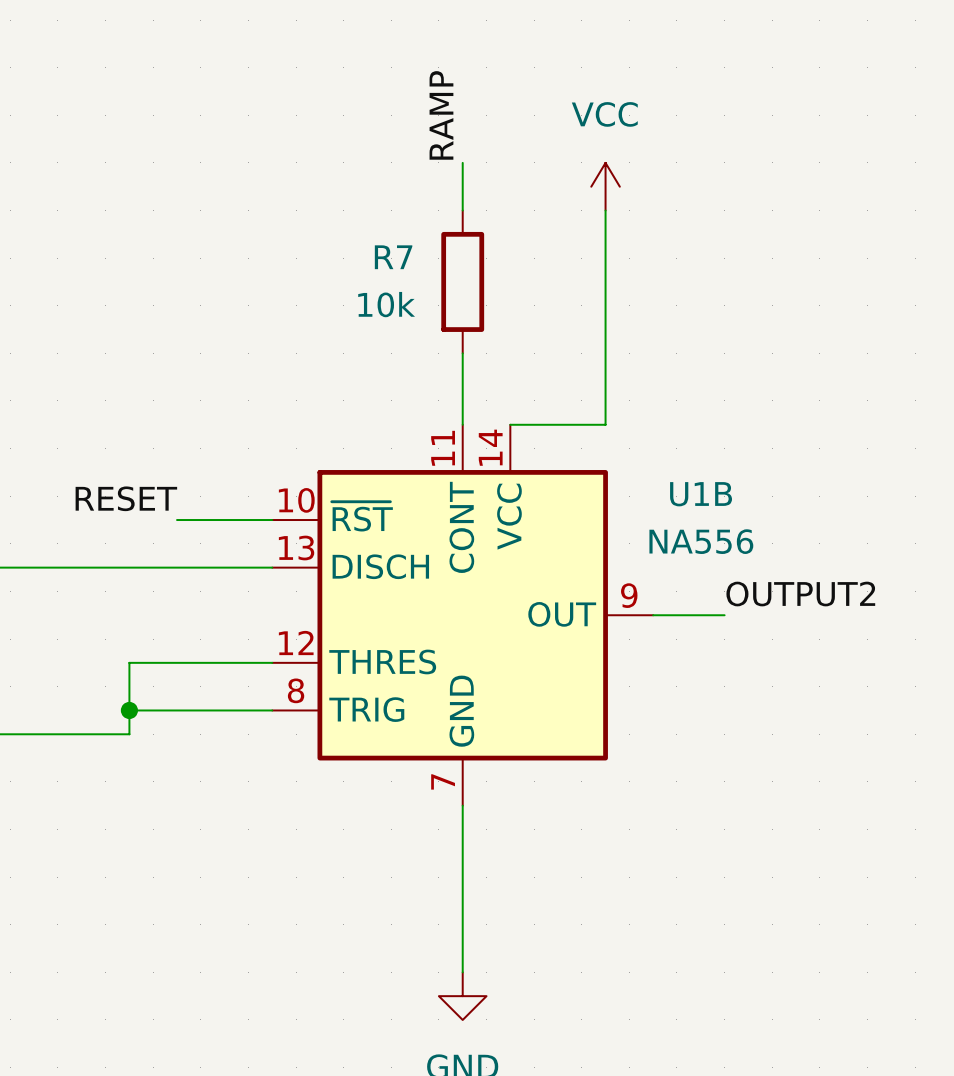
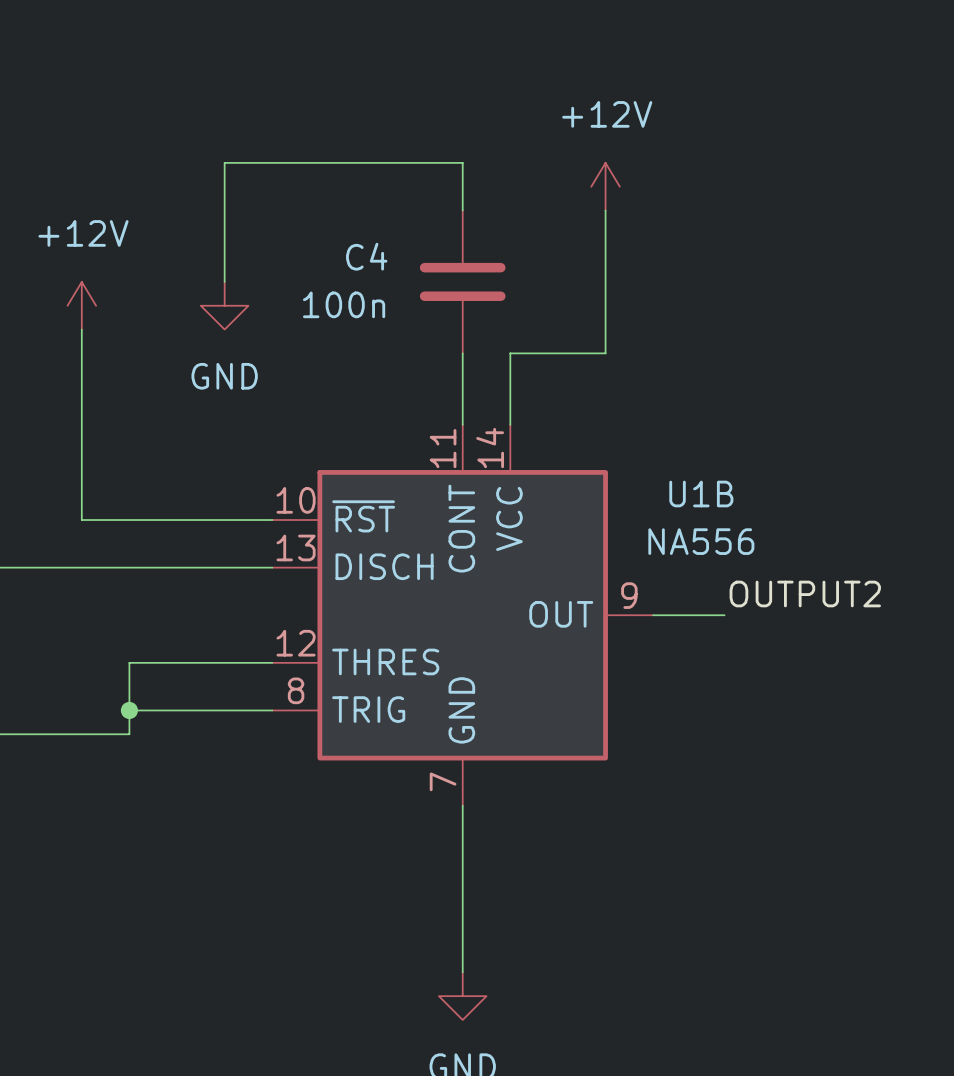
label: RAMP (441, 115) -> none
wire: none -> (462, 162) (224, 162) (224, 281)
power symbol: VCC (605, 186) -> +12V (605, 186)
R7: 10k (462, 281) -> none
C4: none -> 100n (462, 281)
power symbol: none -> +12V (81, 305)
power symbol: none -> GND (224, 305)
wire: none -> (81, 329) (81, 520) (177, 520)
wire: (605, 353) (605, 424) (510, 424) -> (605, 353) (510, 353) (510, 424)
label: RESET (126, 498) -> none

